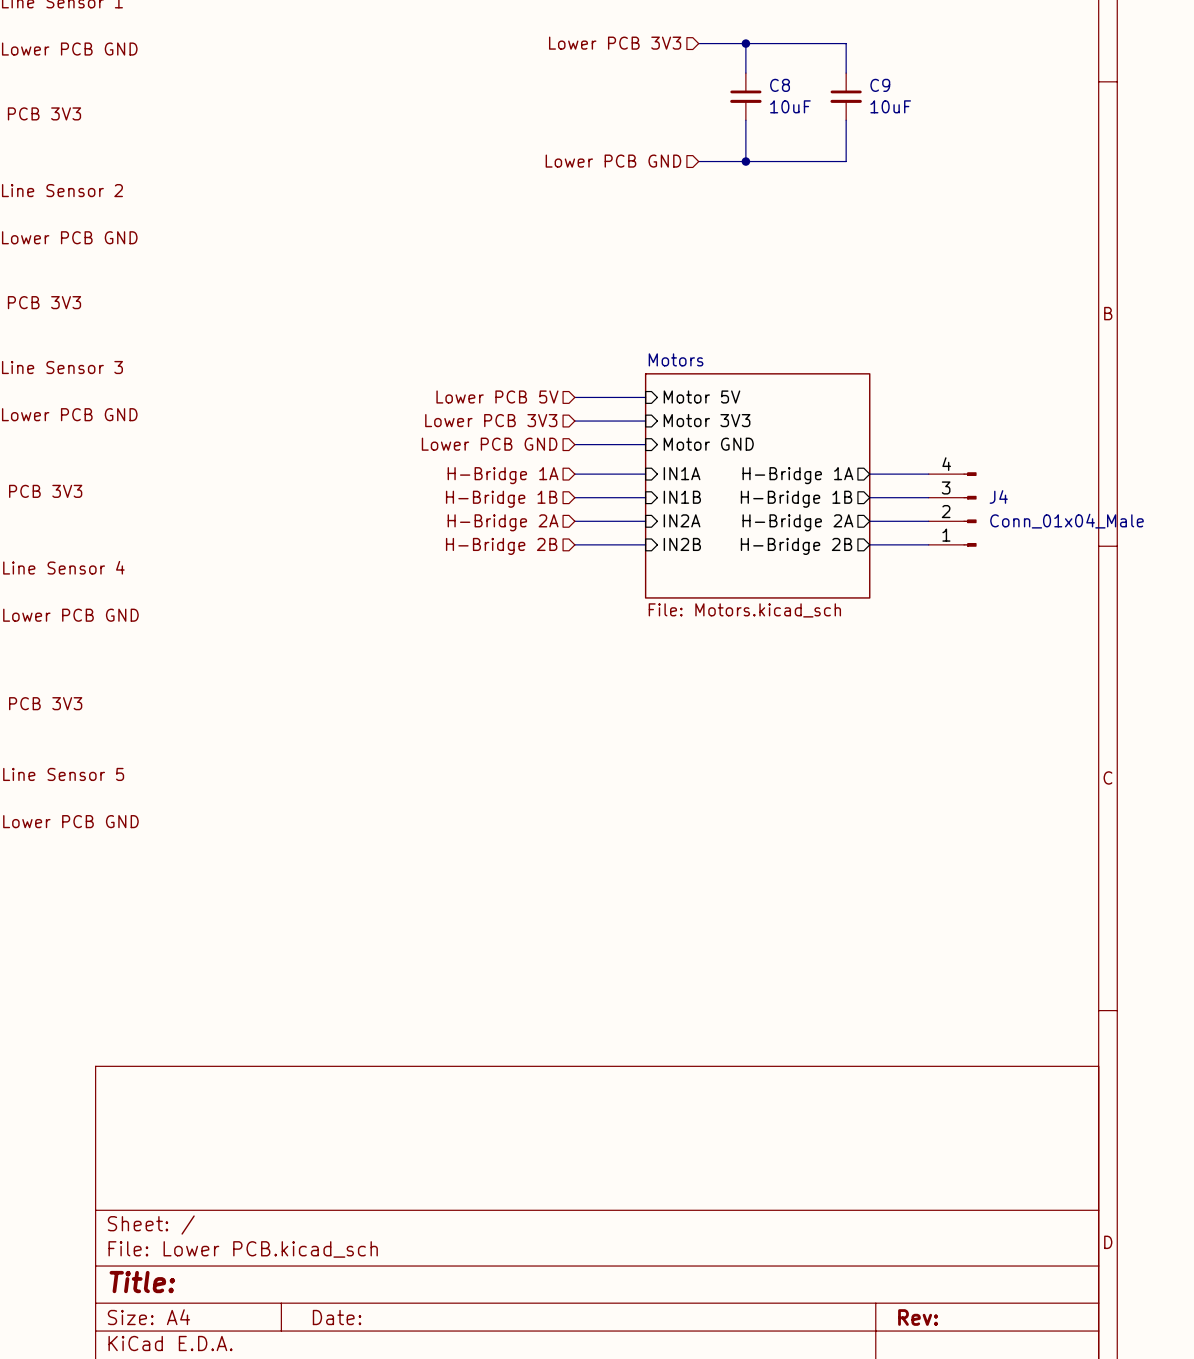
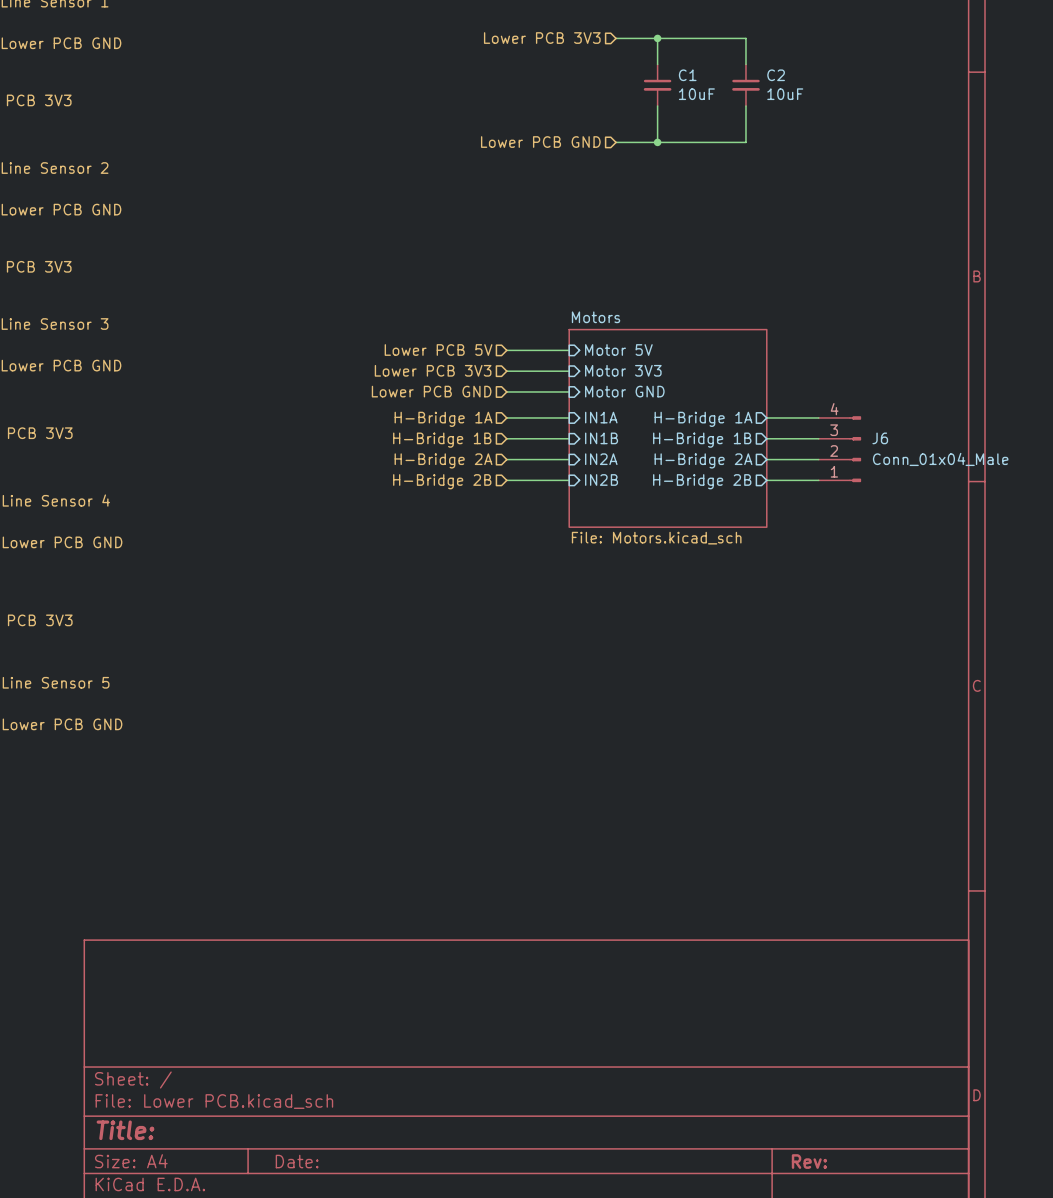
C8 name: C8 (780, 85) -> C1 (687, 75)
C9 name: C9 (880, 85) -> C2 (776, 75)
J4 name: J4 (998, 496) -> J6 (880, 438)

